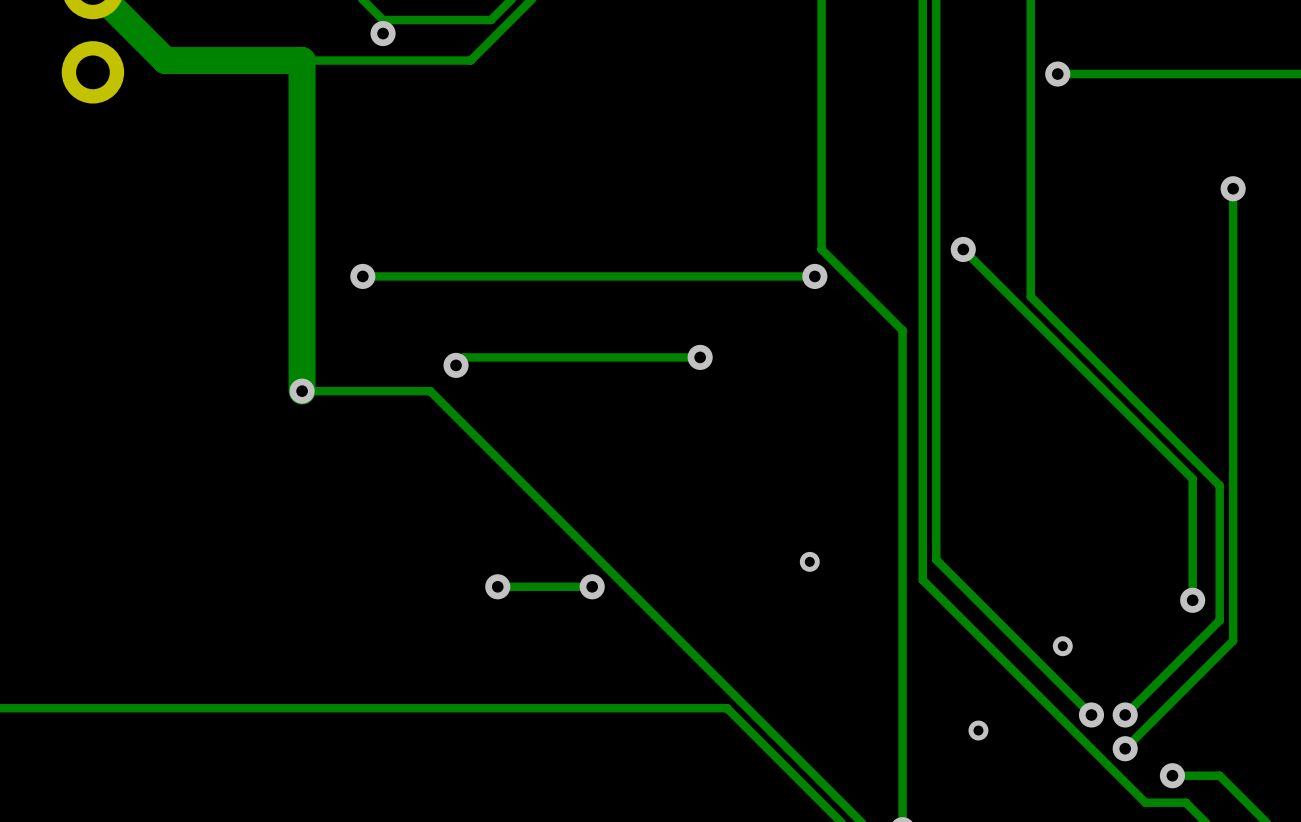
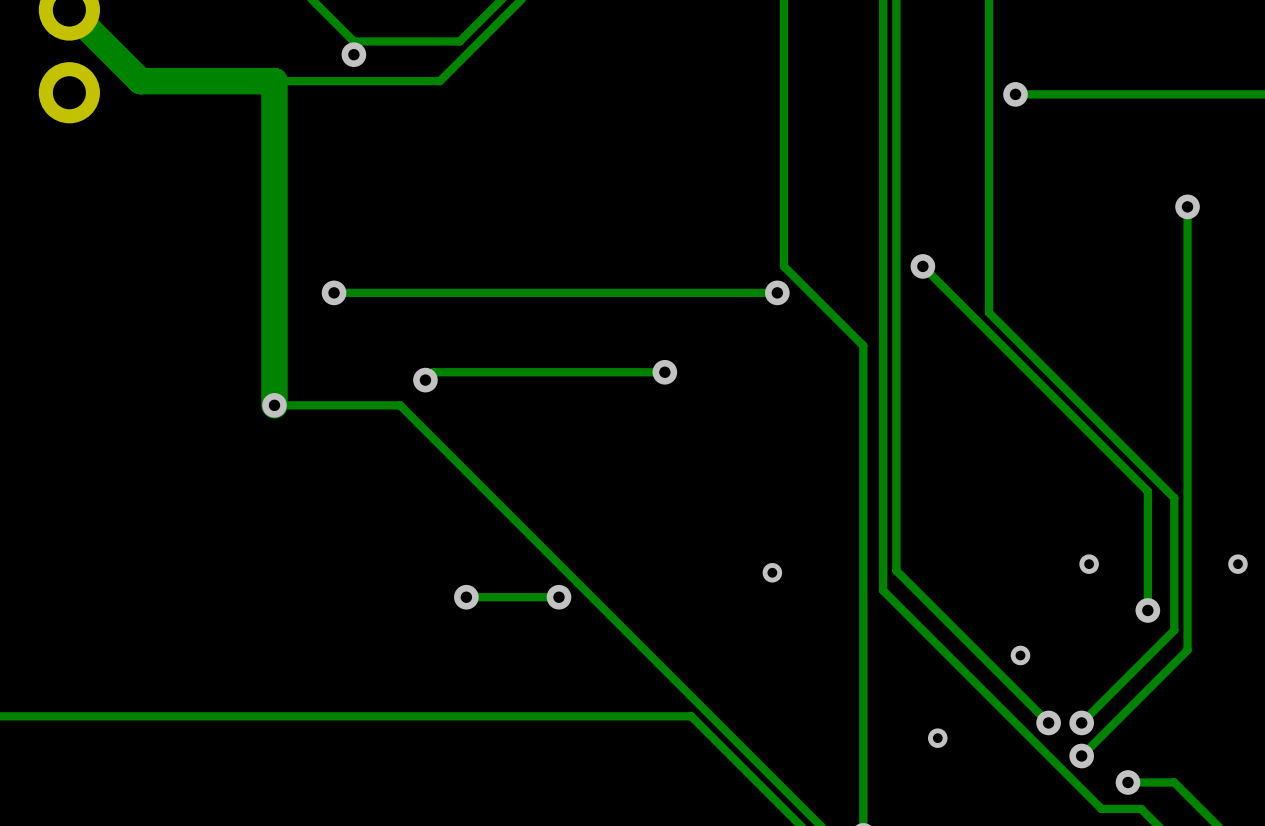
via: none -> (1089, 564)
via: none -> (1237, 564)

